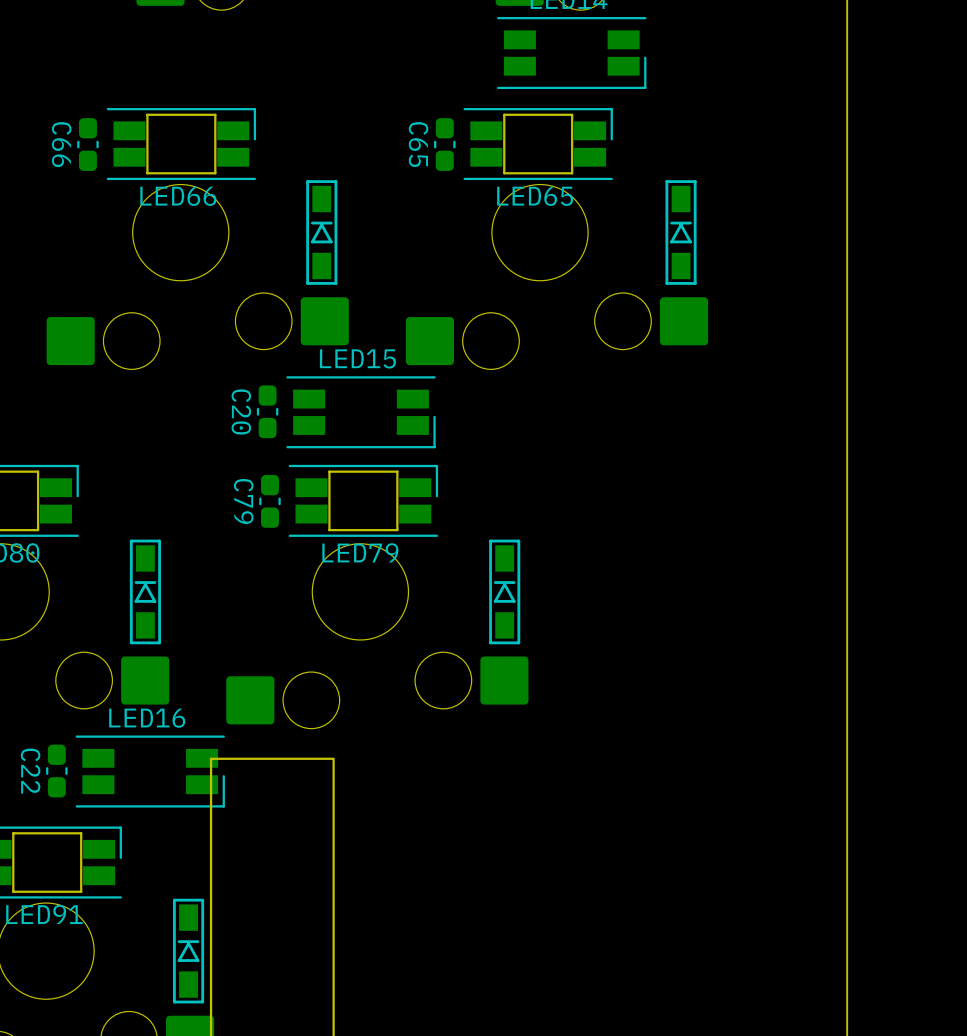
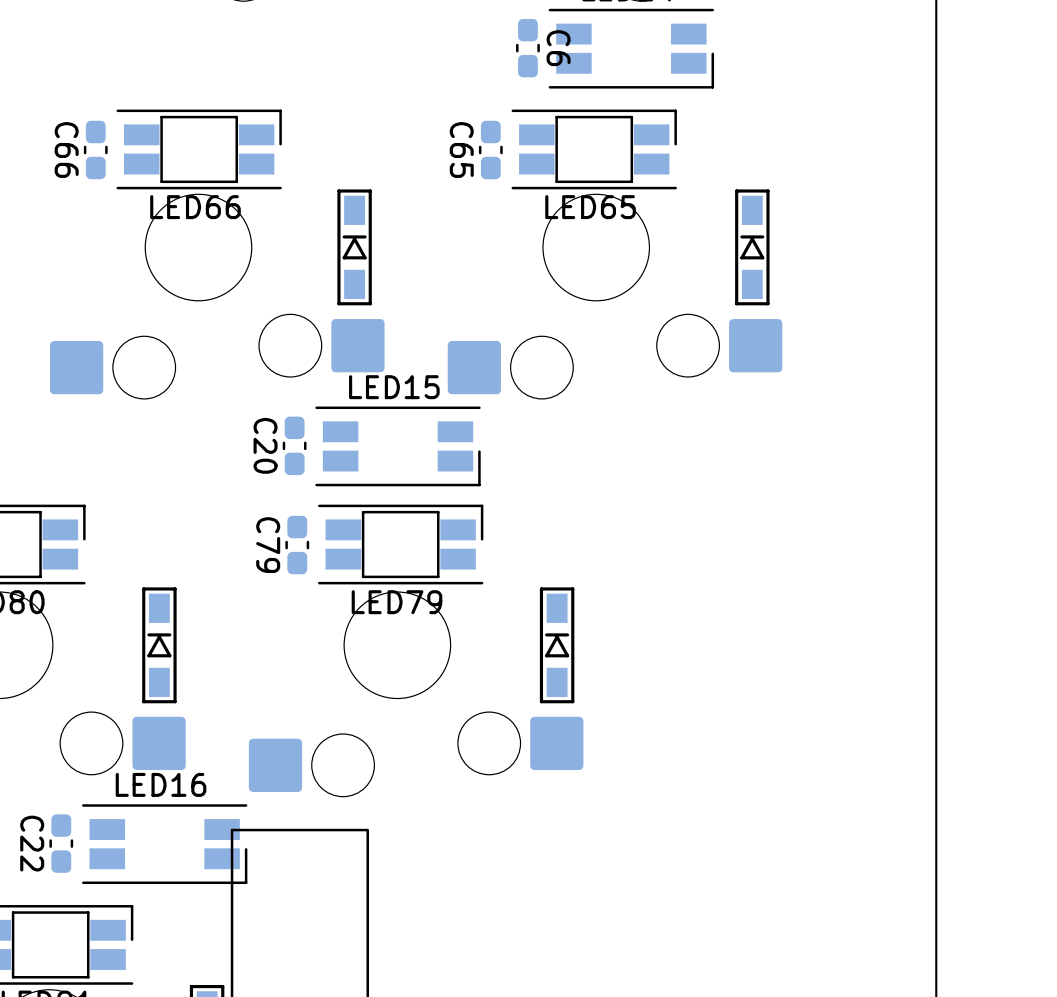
C6: none -> (527, 48)

